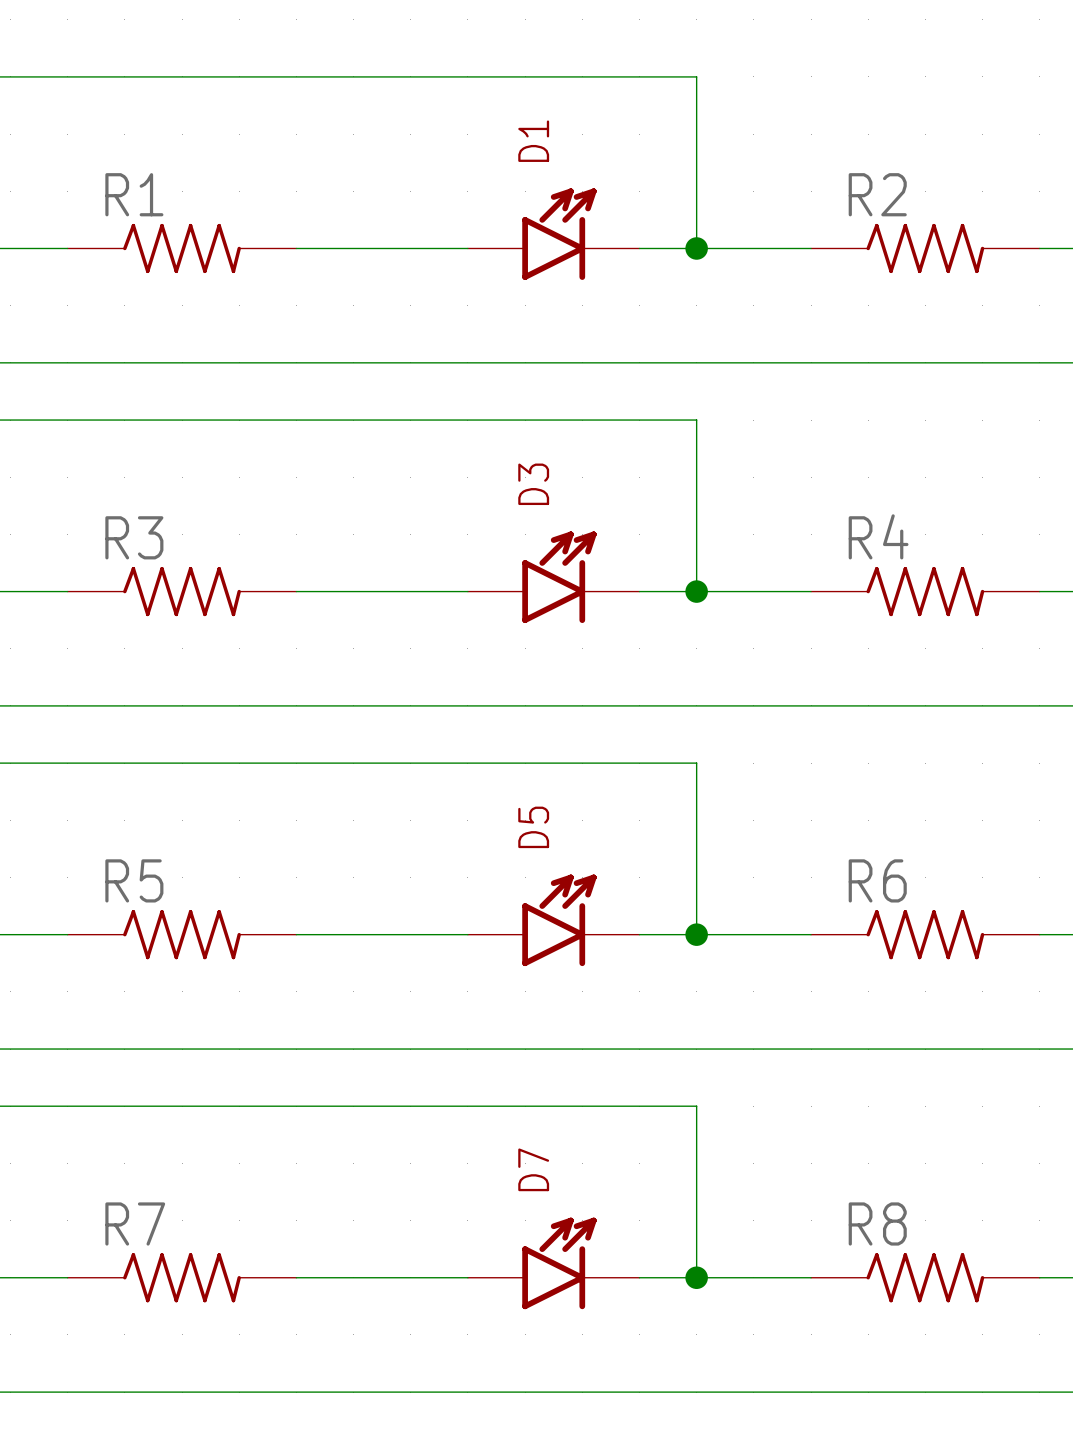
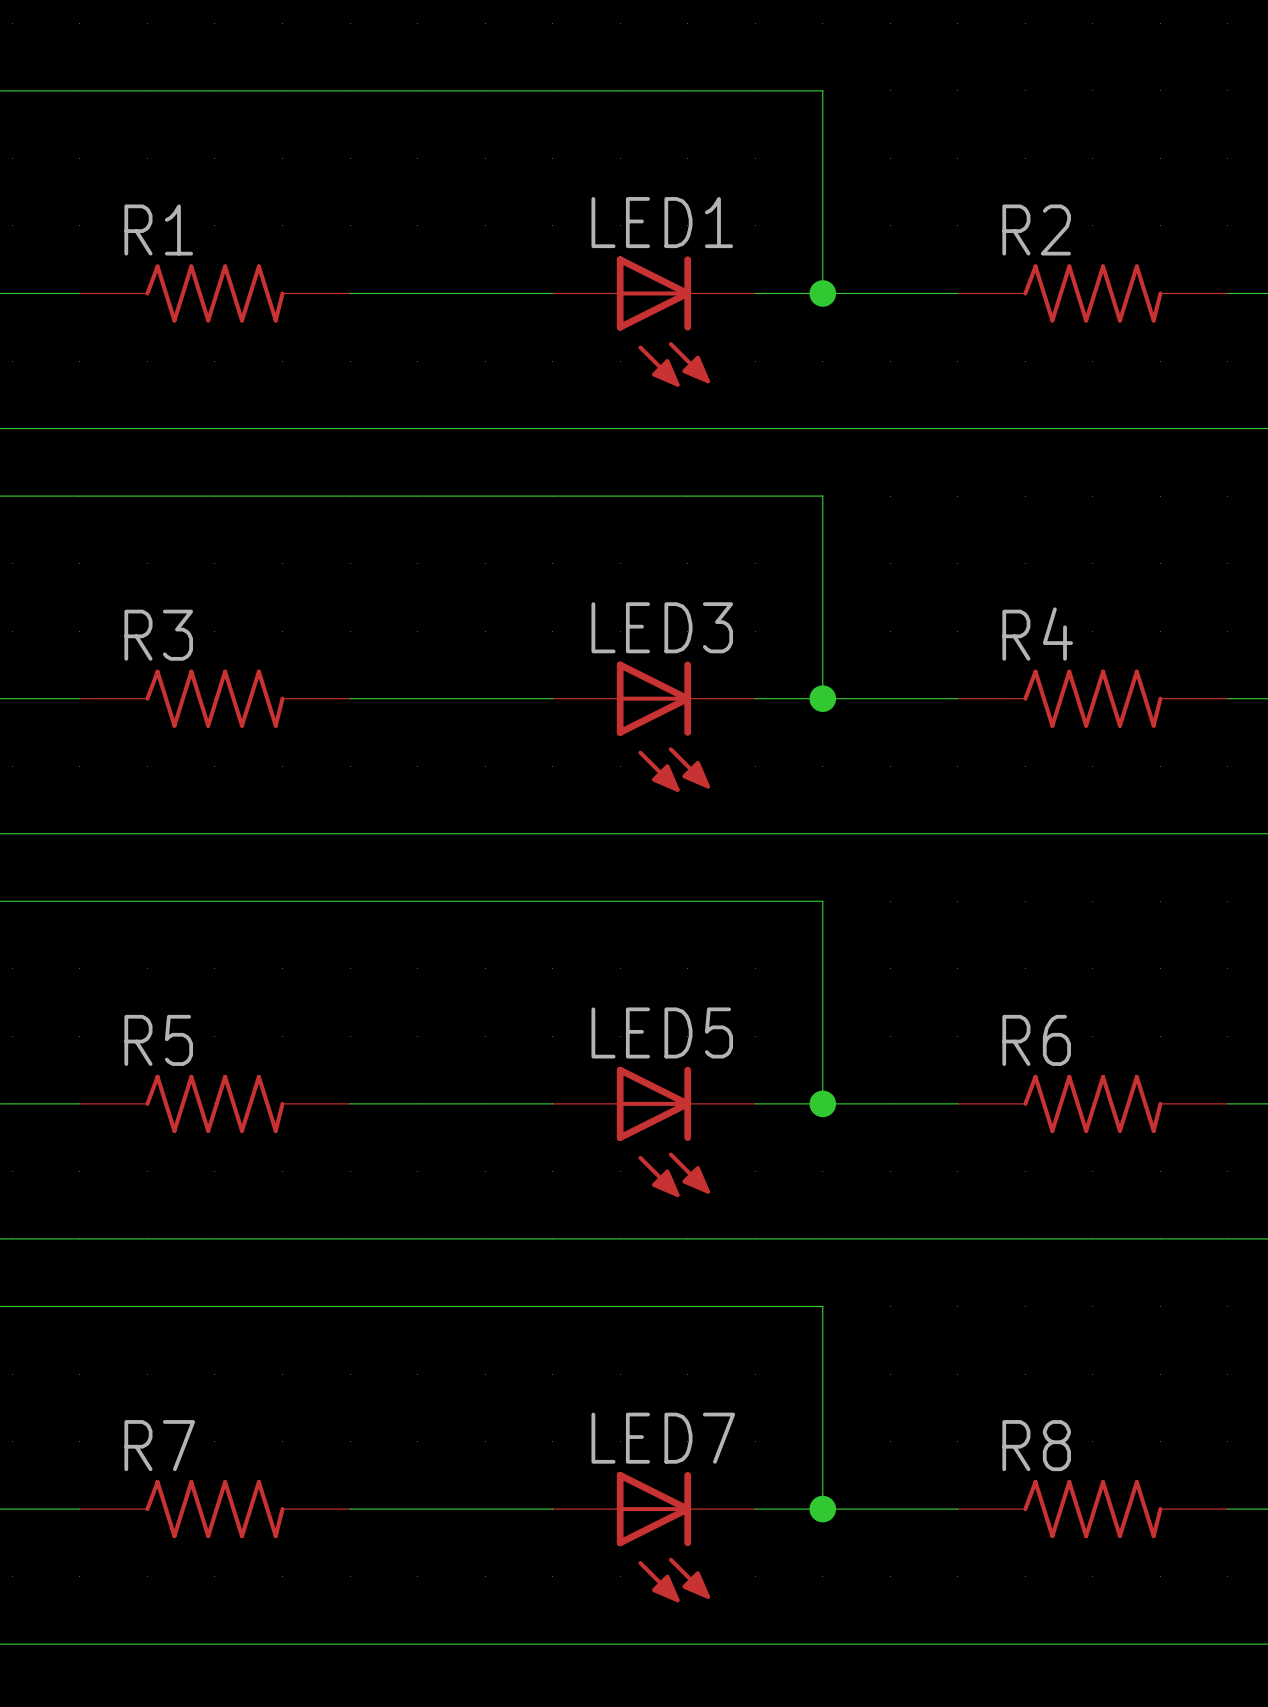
D1: (553, 234) -> none
LED1: none -> (653, 321)
D3: (553, 577) -> none
LED3: none -> (653, 726)
D5: (553, 920) -> none
LED5: none -> (653, 1131)
D7: (553, 1263) -> none
LED7: none -> (653, 1537)

